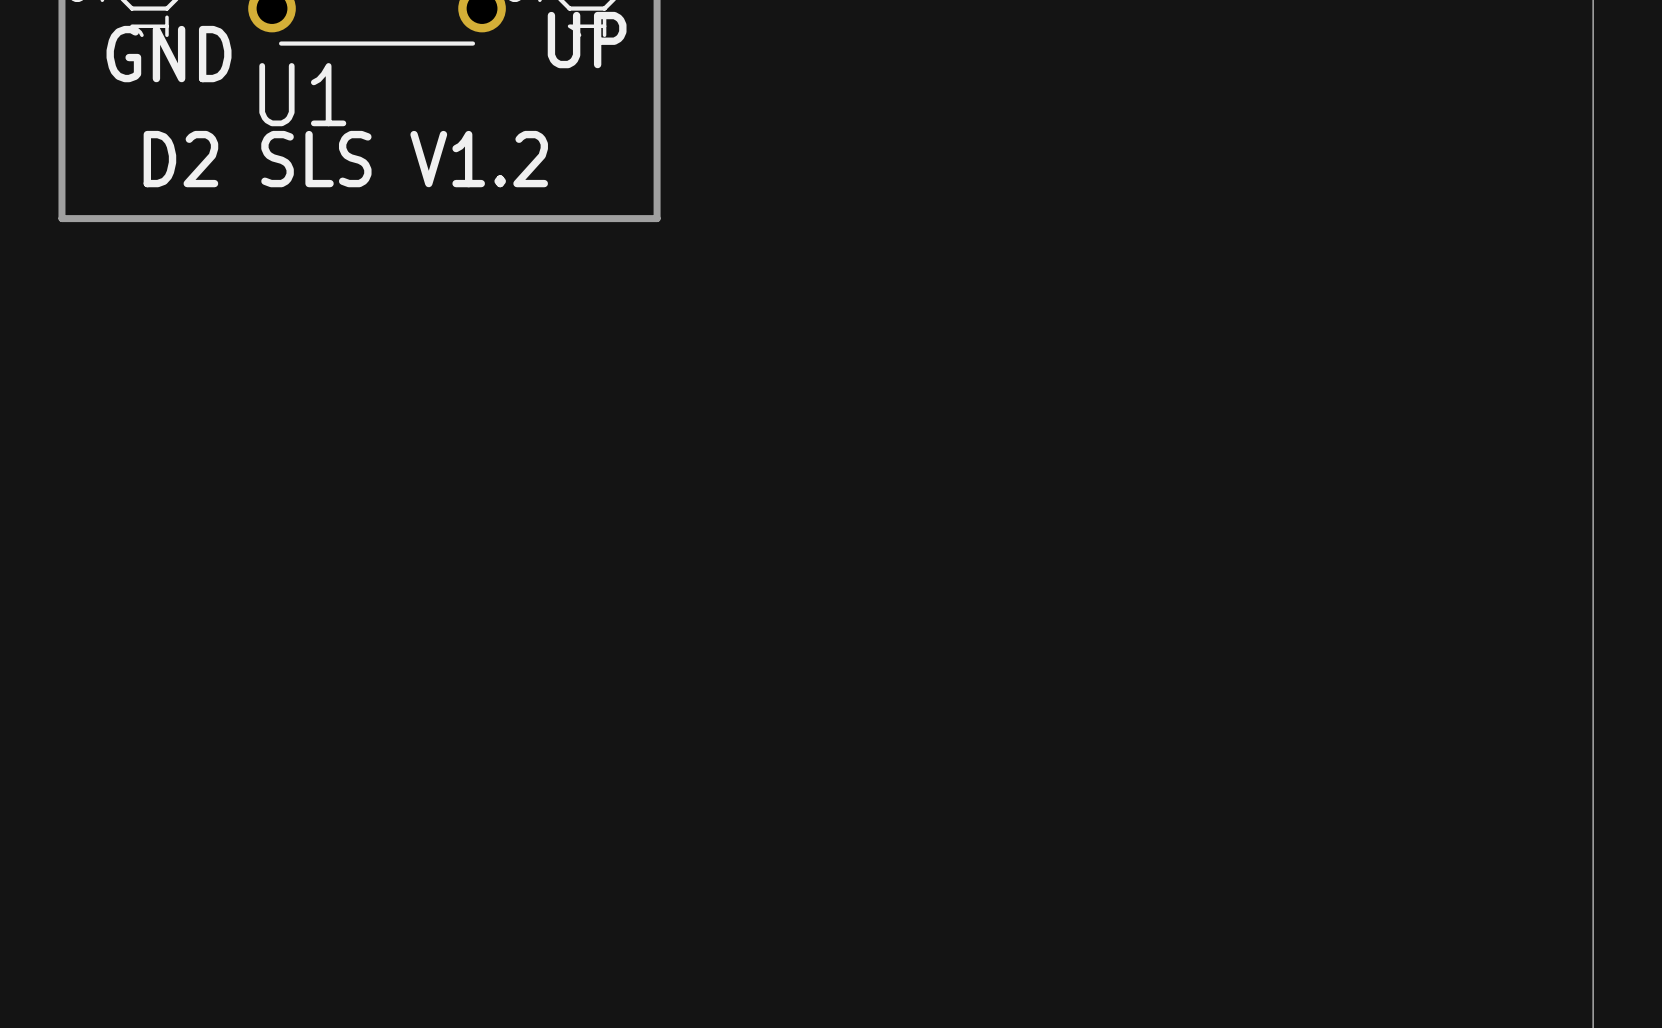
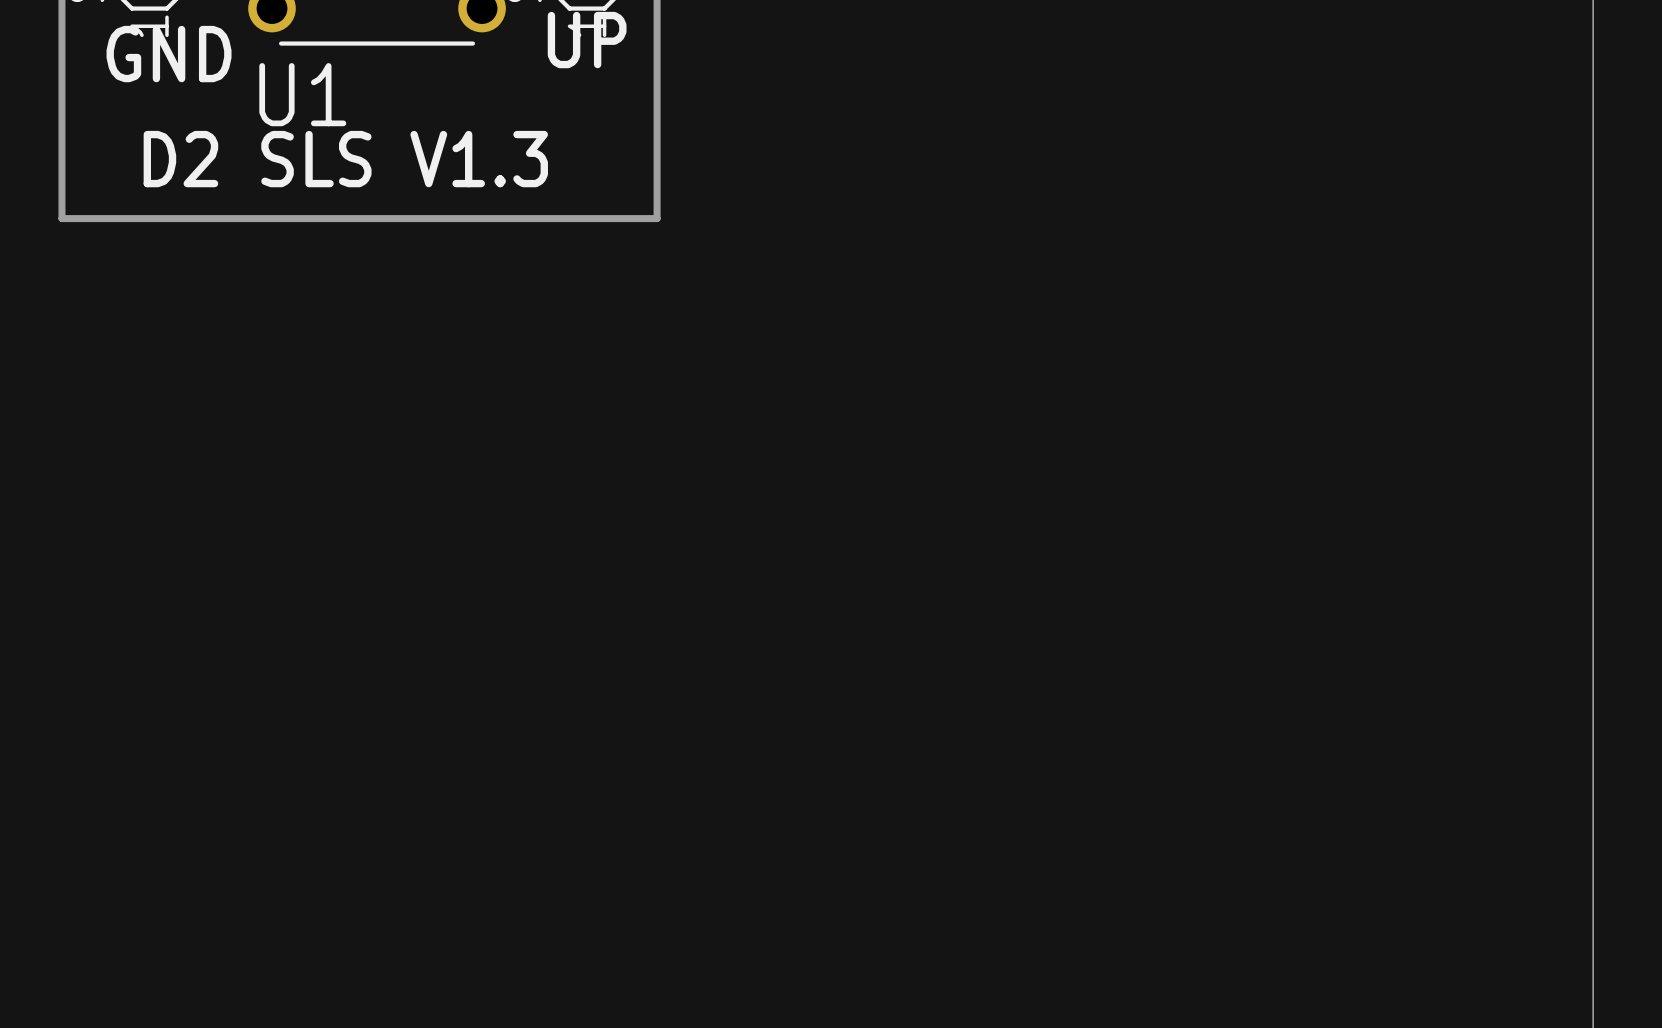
text: D2 SLS V1.2 (345, 159) -> D2 SLS V1.3 (345, 159)

